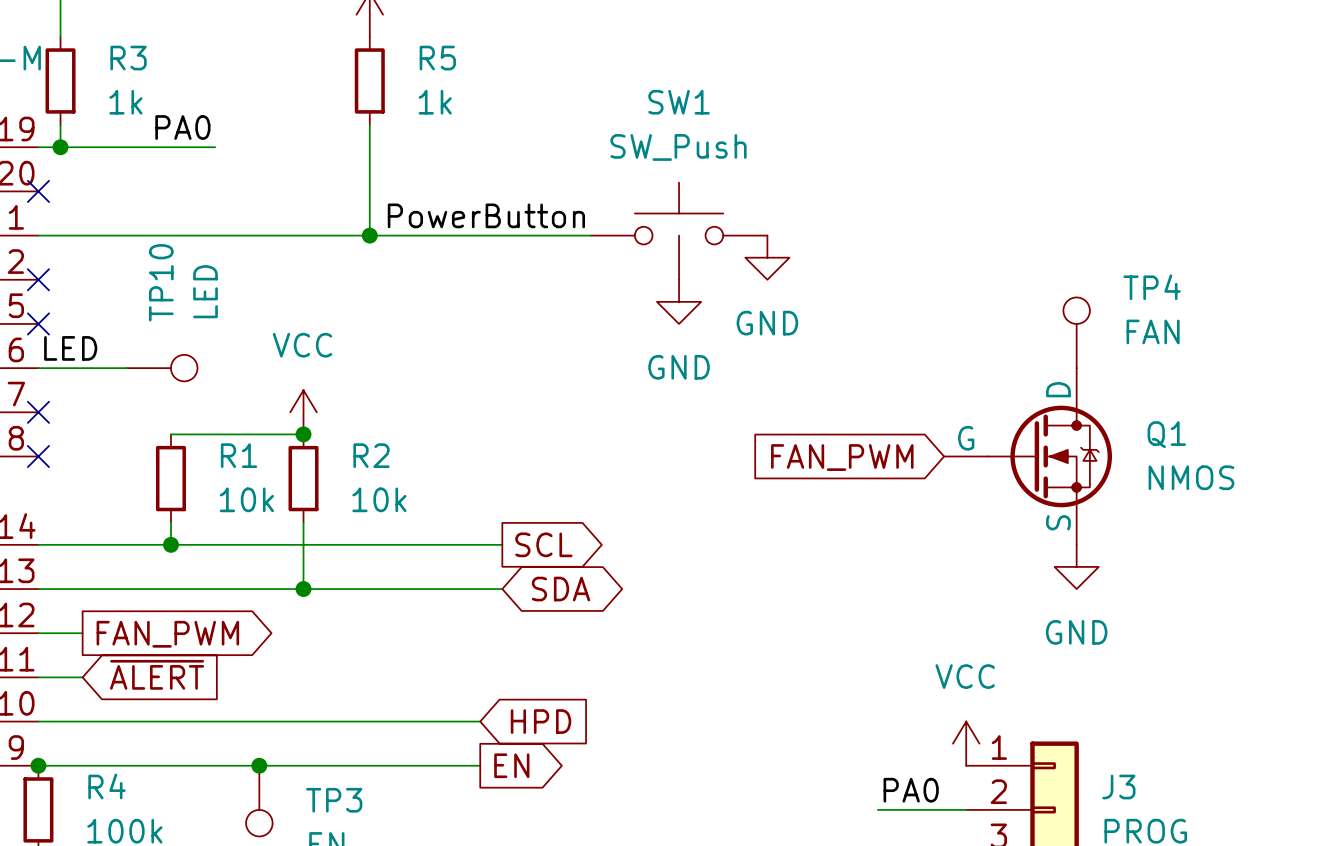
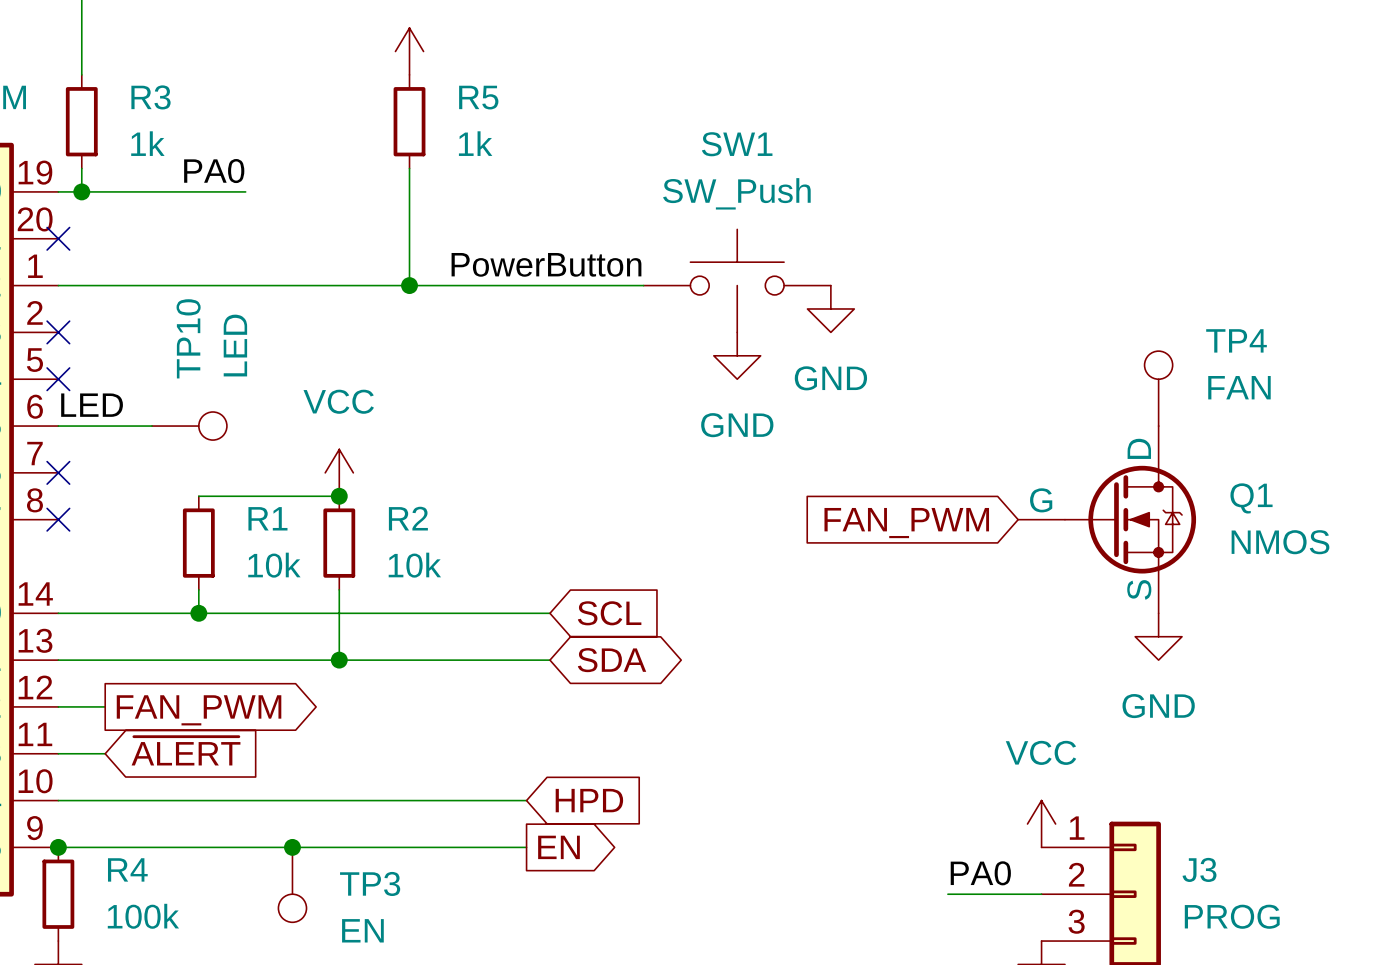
global label shape: output (543, 544) -> input (609, 613)

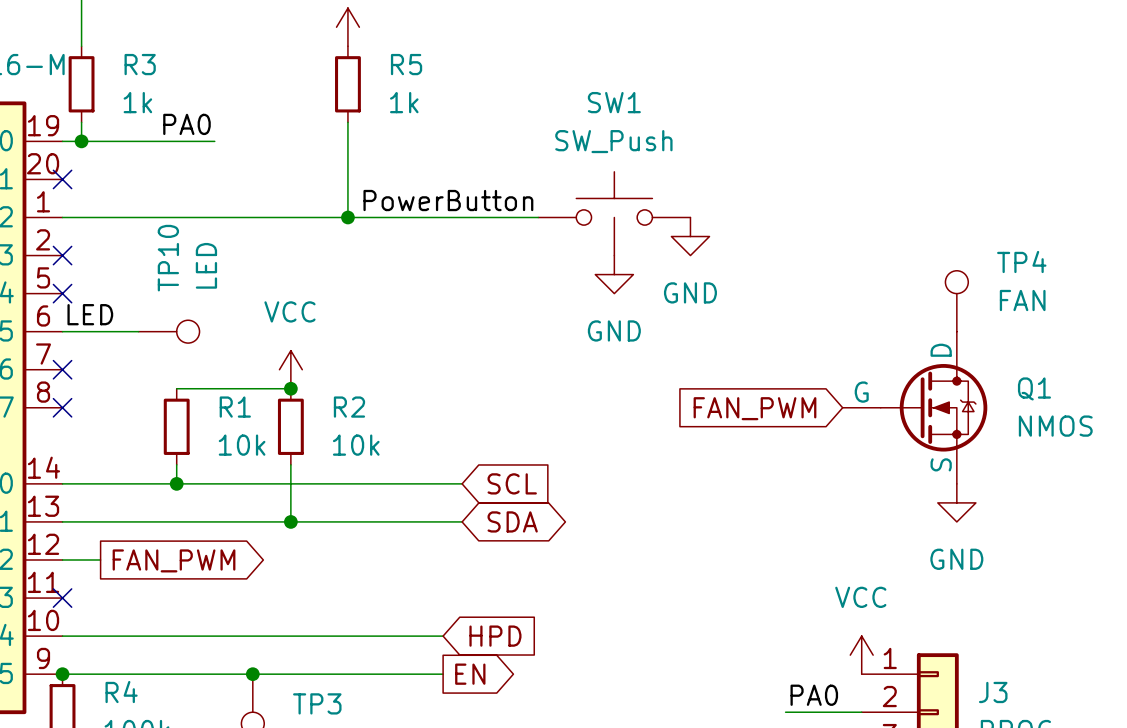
global label: ~{ALERT} (186, 751) -> none
wire: (58, 753) (105, 753) -> none
no-connect mark: none -> (62, 598)

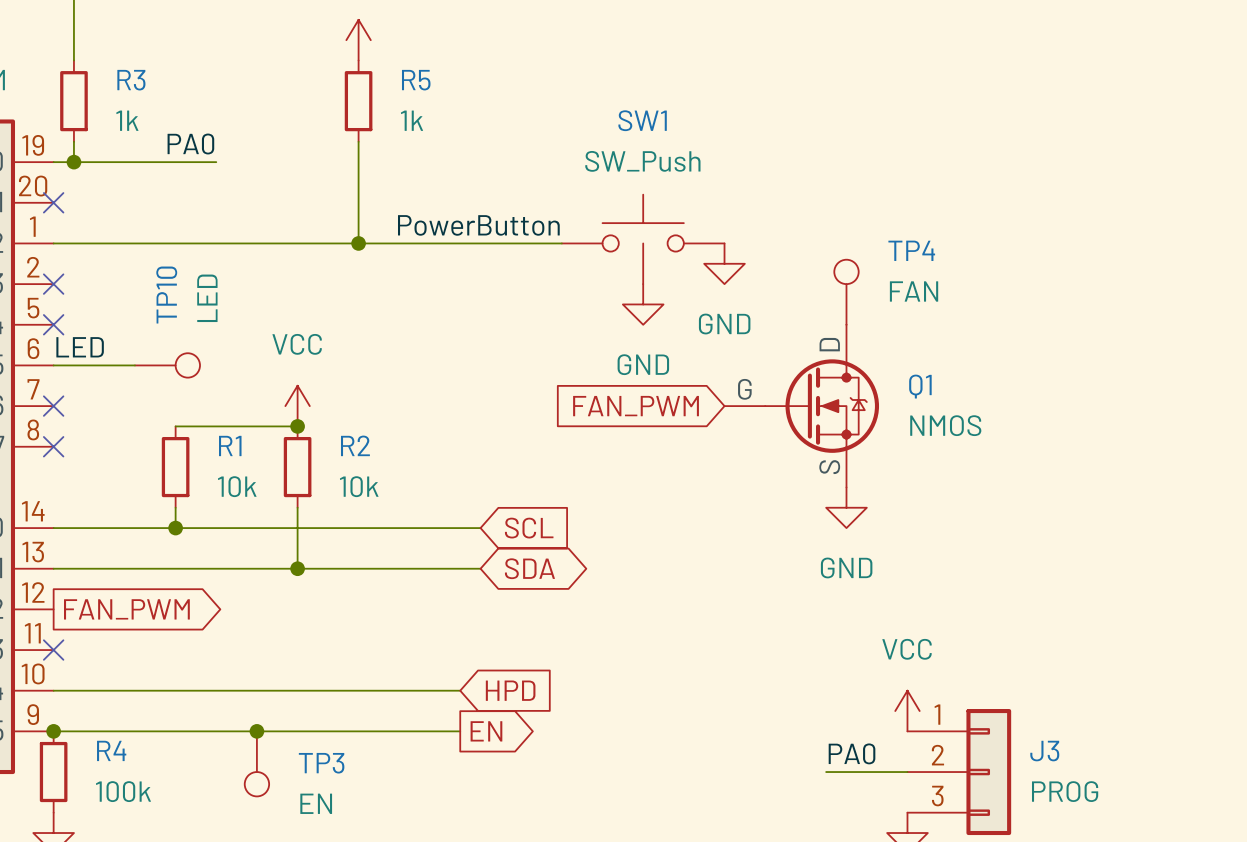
TP4 position: (956, 301) -> (846, 292)
Q1 position: (914, 407) -> (801, 406)
global label position: FAN_PWM (754, 408) -> FAN_PWM (636, 406)
power symbol position: GND (956, 502) -> GND (846, 507)
wire: (62, 560) (100, 560) -> none
global label position: FAN_PWM (174, 560) -> FAN_PWM (126, 609)

